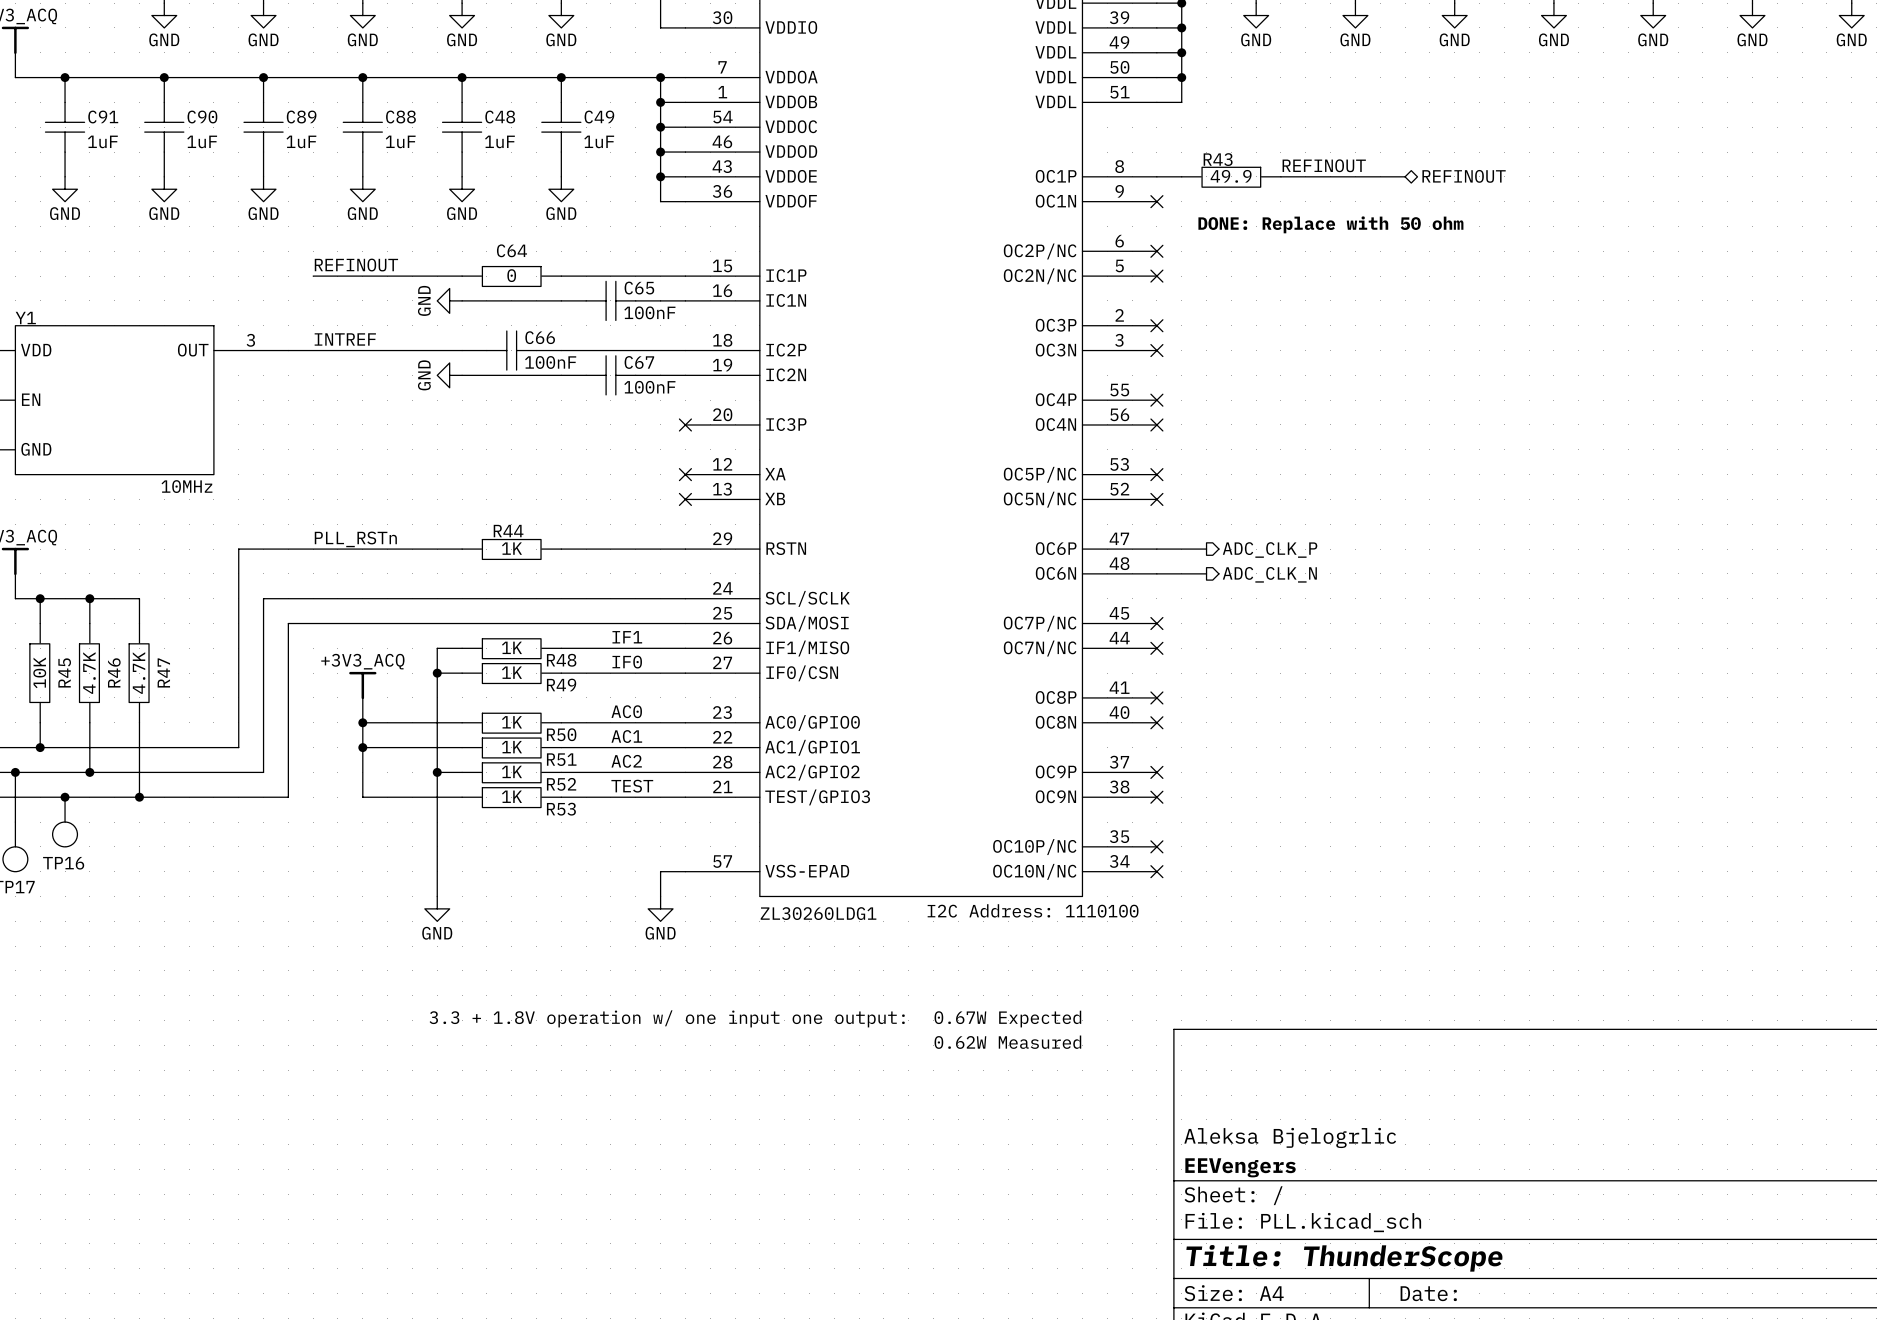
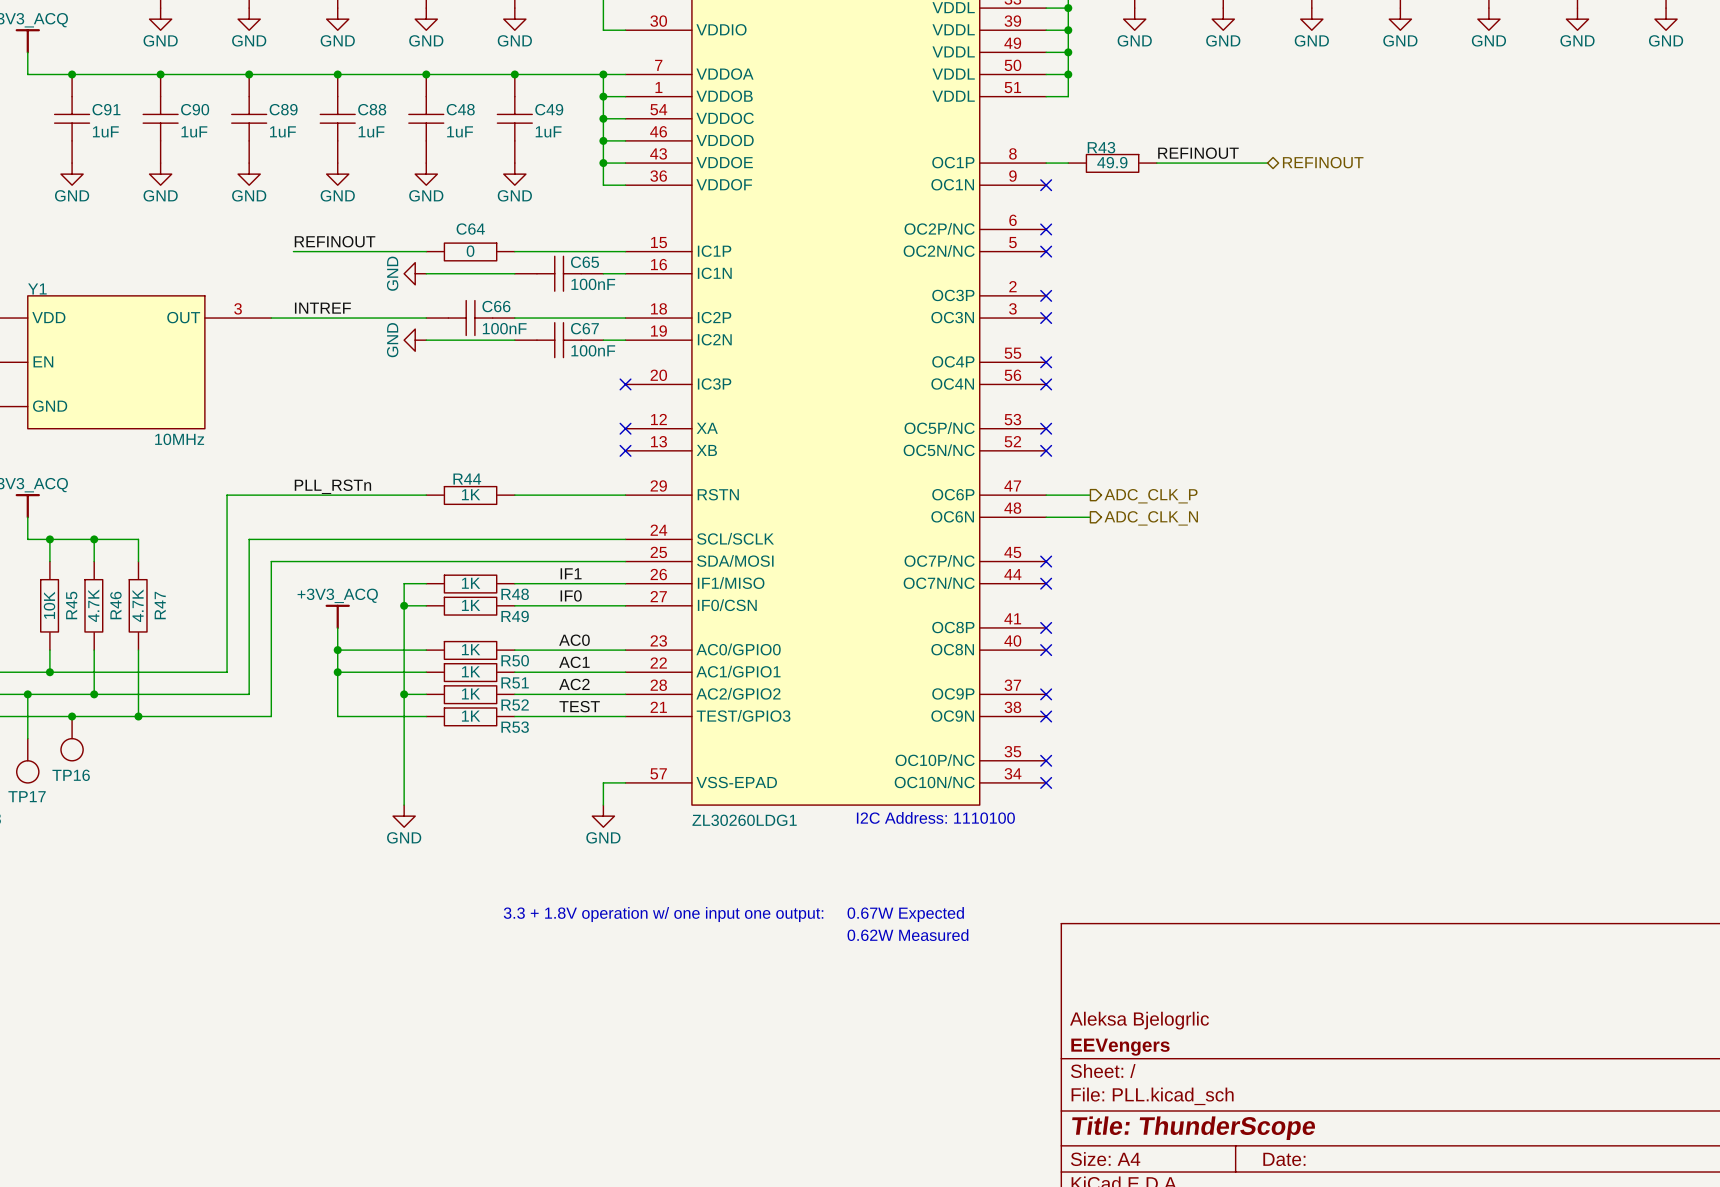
text: DONE: Replace with 50 ohm (1330, 224) -> none

